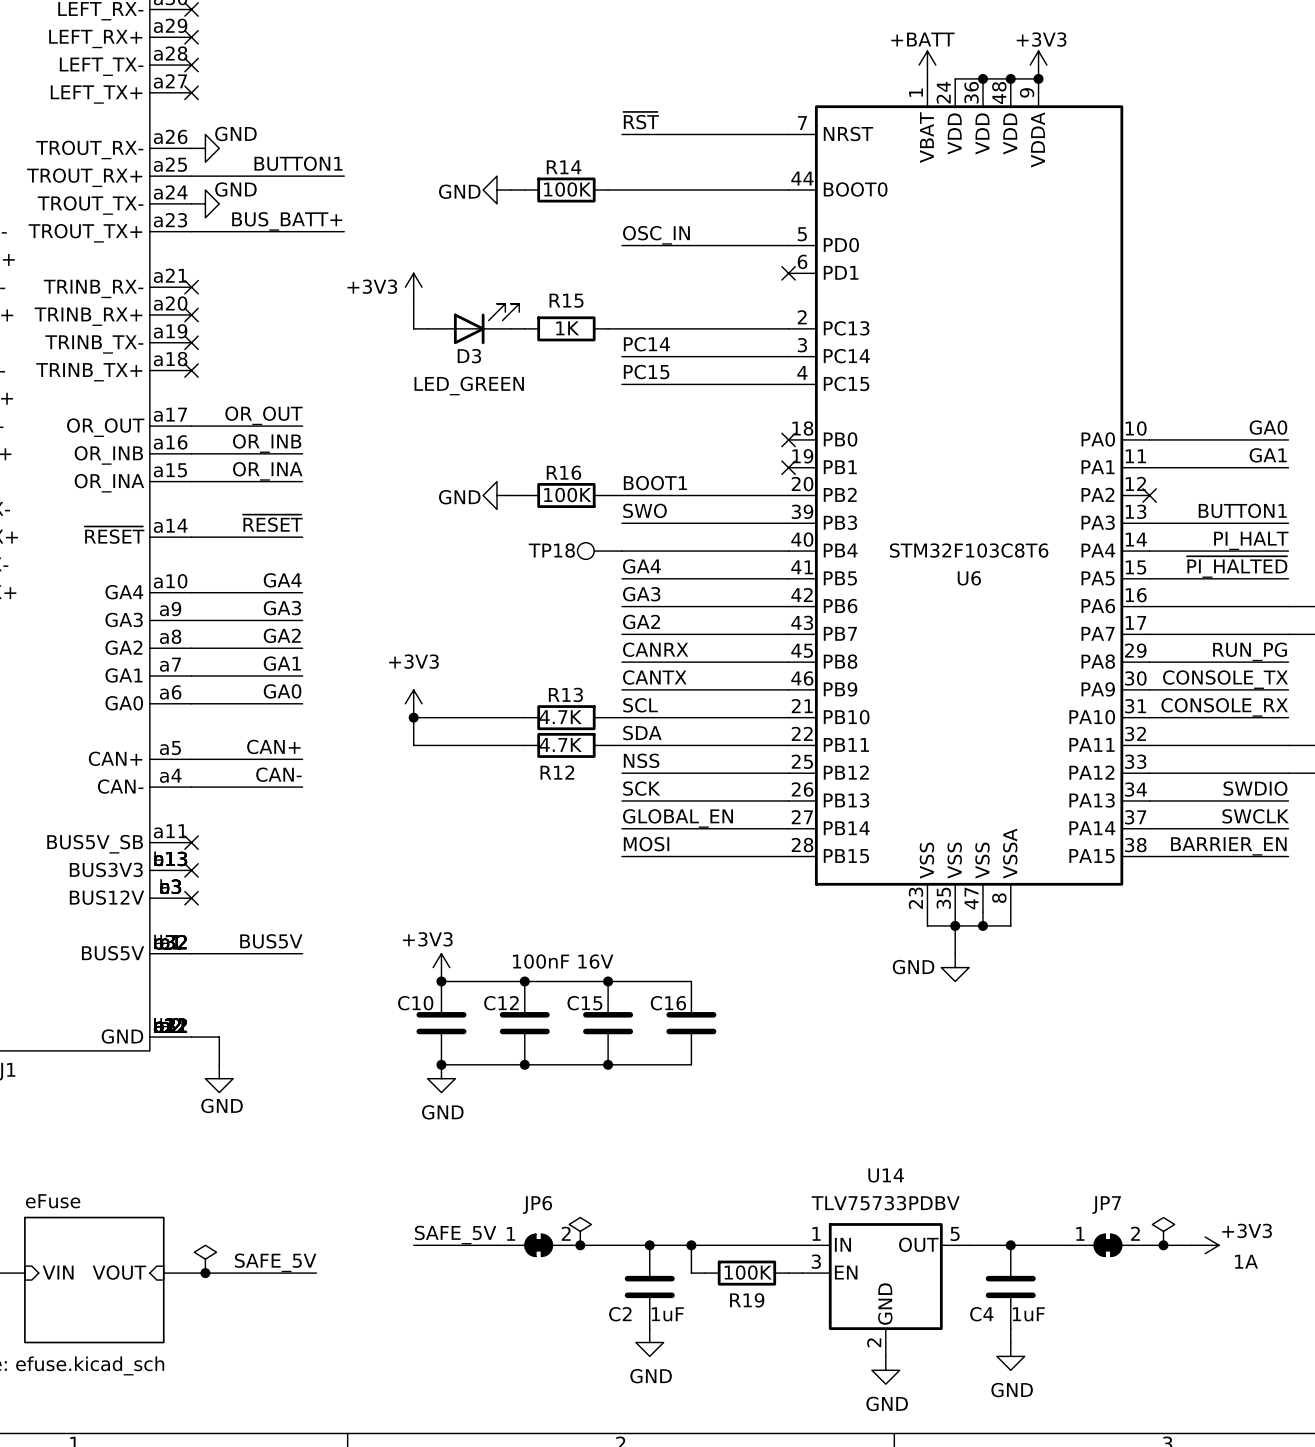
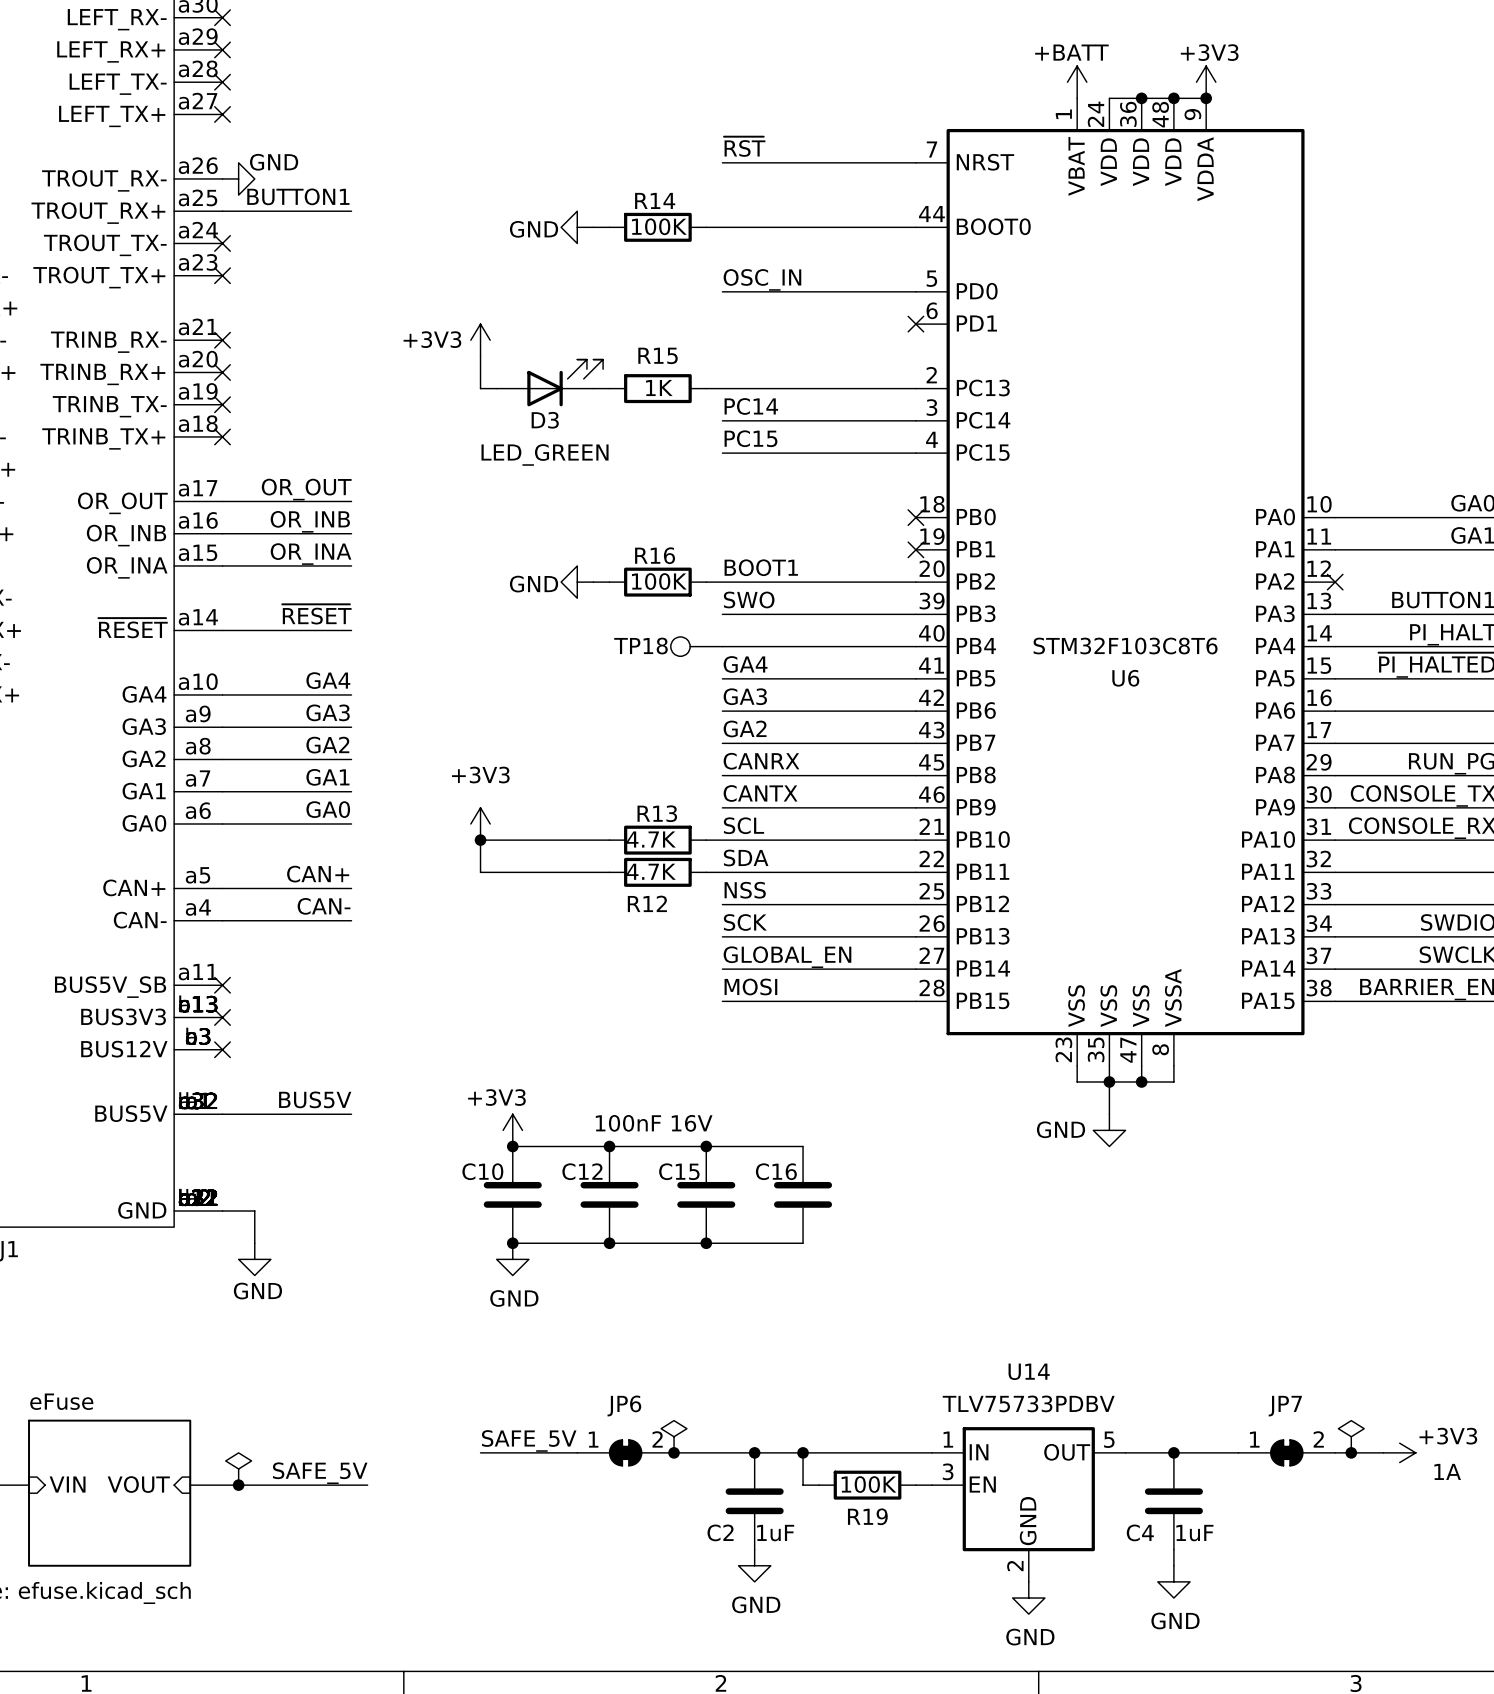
label position: BUTTON1 (298, 163) -> BUTTON1 (298, 196)
wire: (302, 176) (344, 176) -> none
no-connect mark: none -> (222, 243)
power symbol: GND (205, 203) -> none
label: BUS_BATT+ (287, 221) -> none
wire: (191, 231) (344, 231) -> none
no-connect mark: none -> (222, 275)

